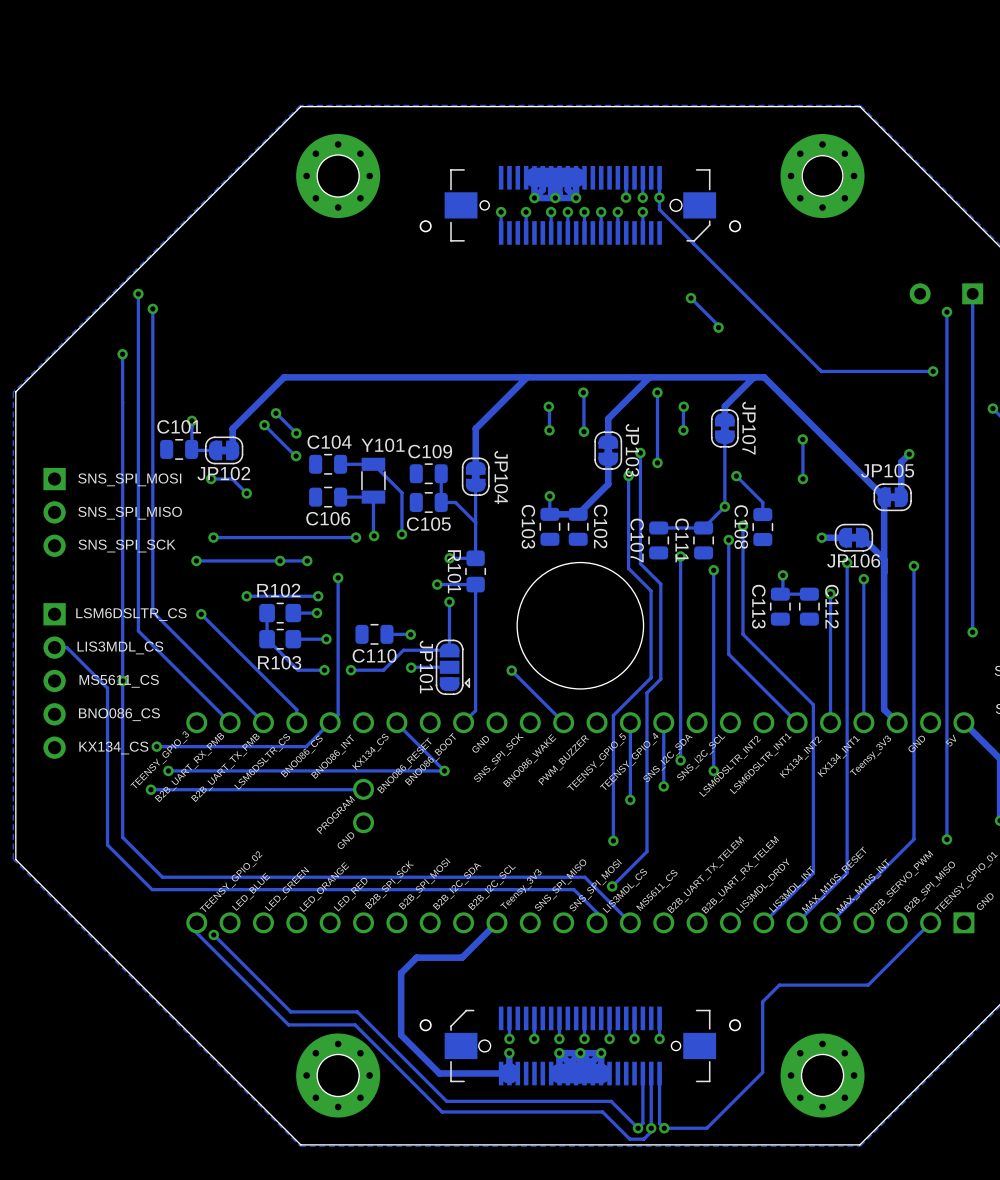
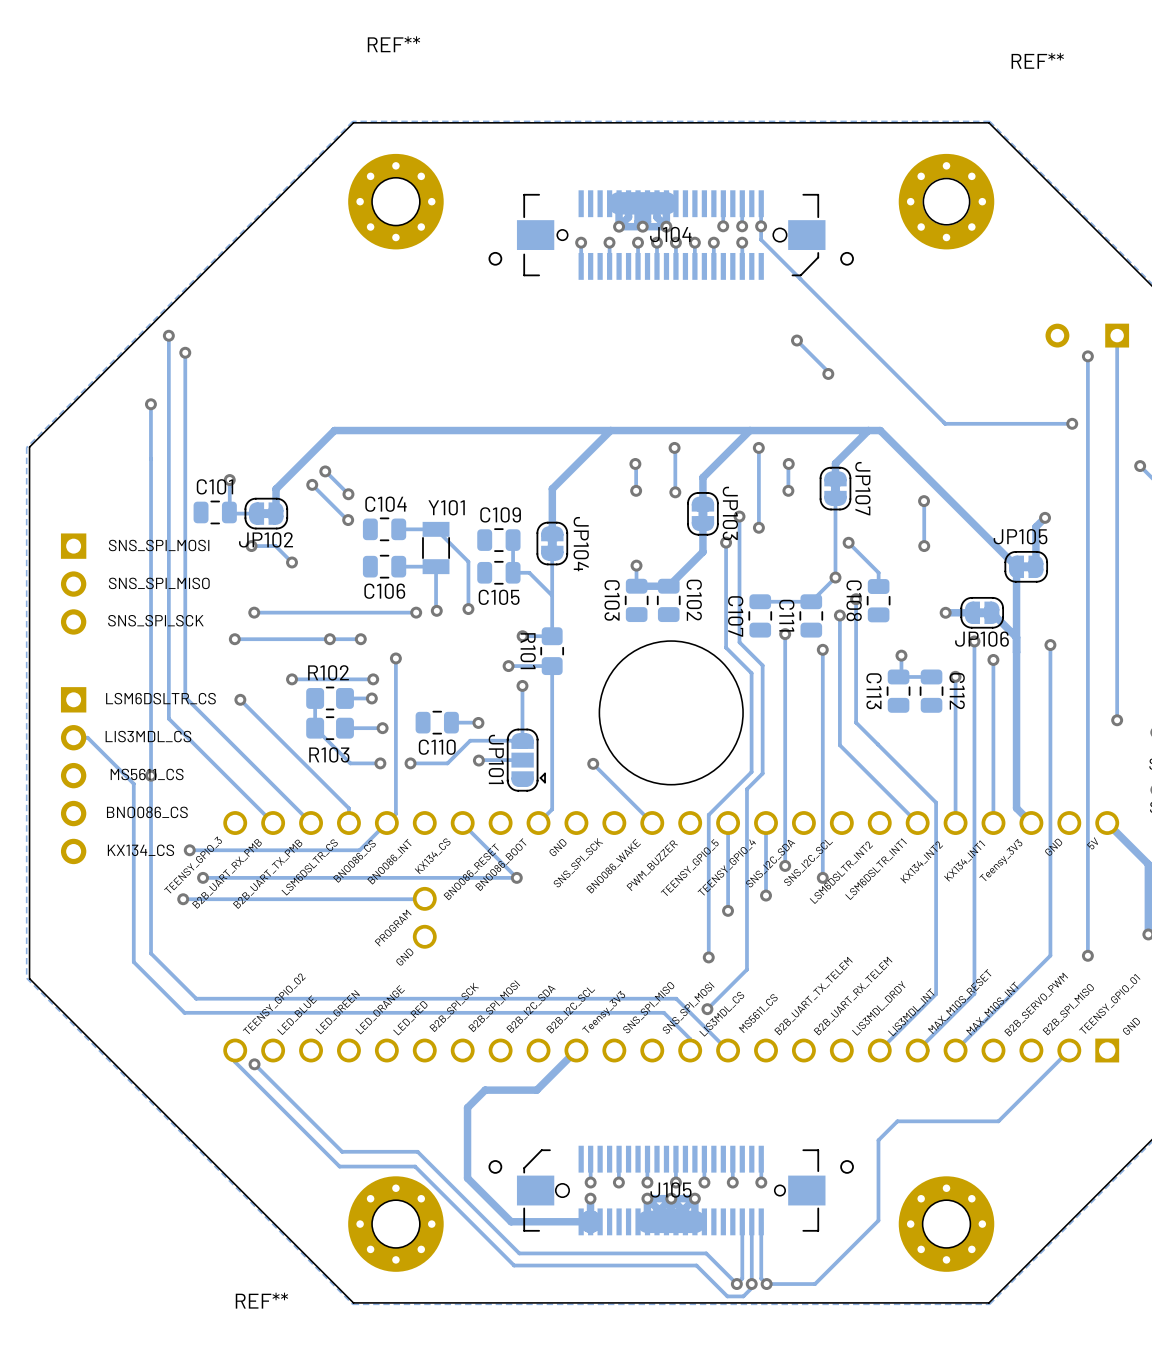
REF** name: none -> REF** (393, 44)
REF** name: none -> REF** (1037, 60)
J104 name: none -> J104 (670, 234)
J105 name: none -> J105 (670, 1189)
REF** name: none -> REF** (261, 1300)

